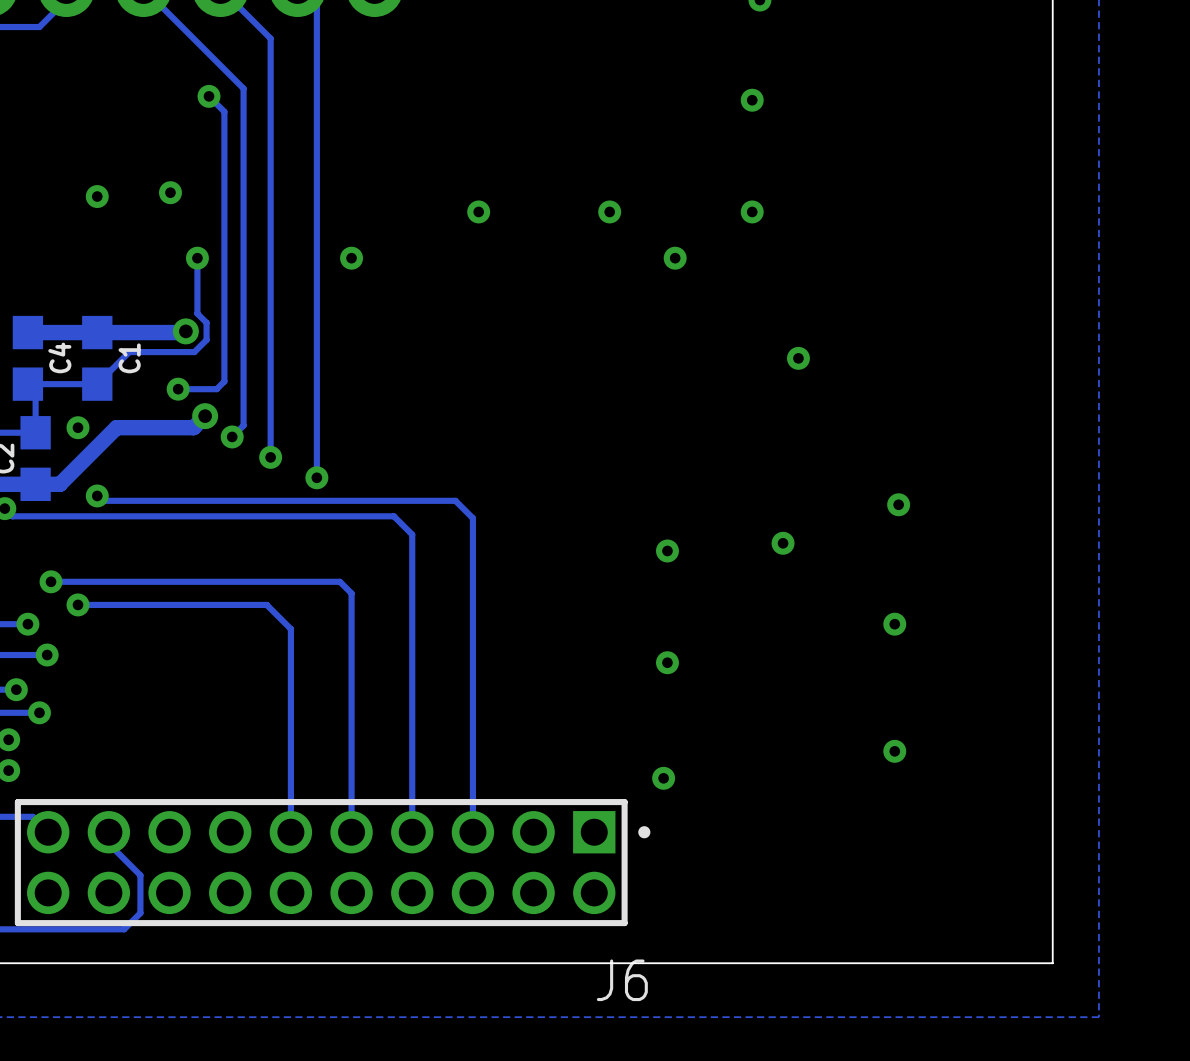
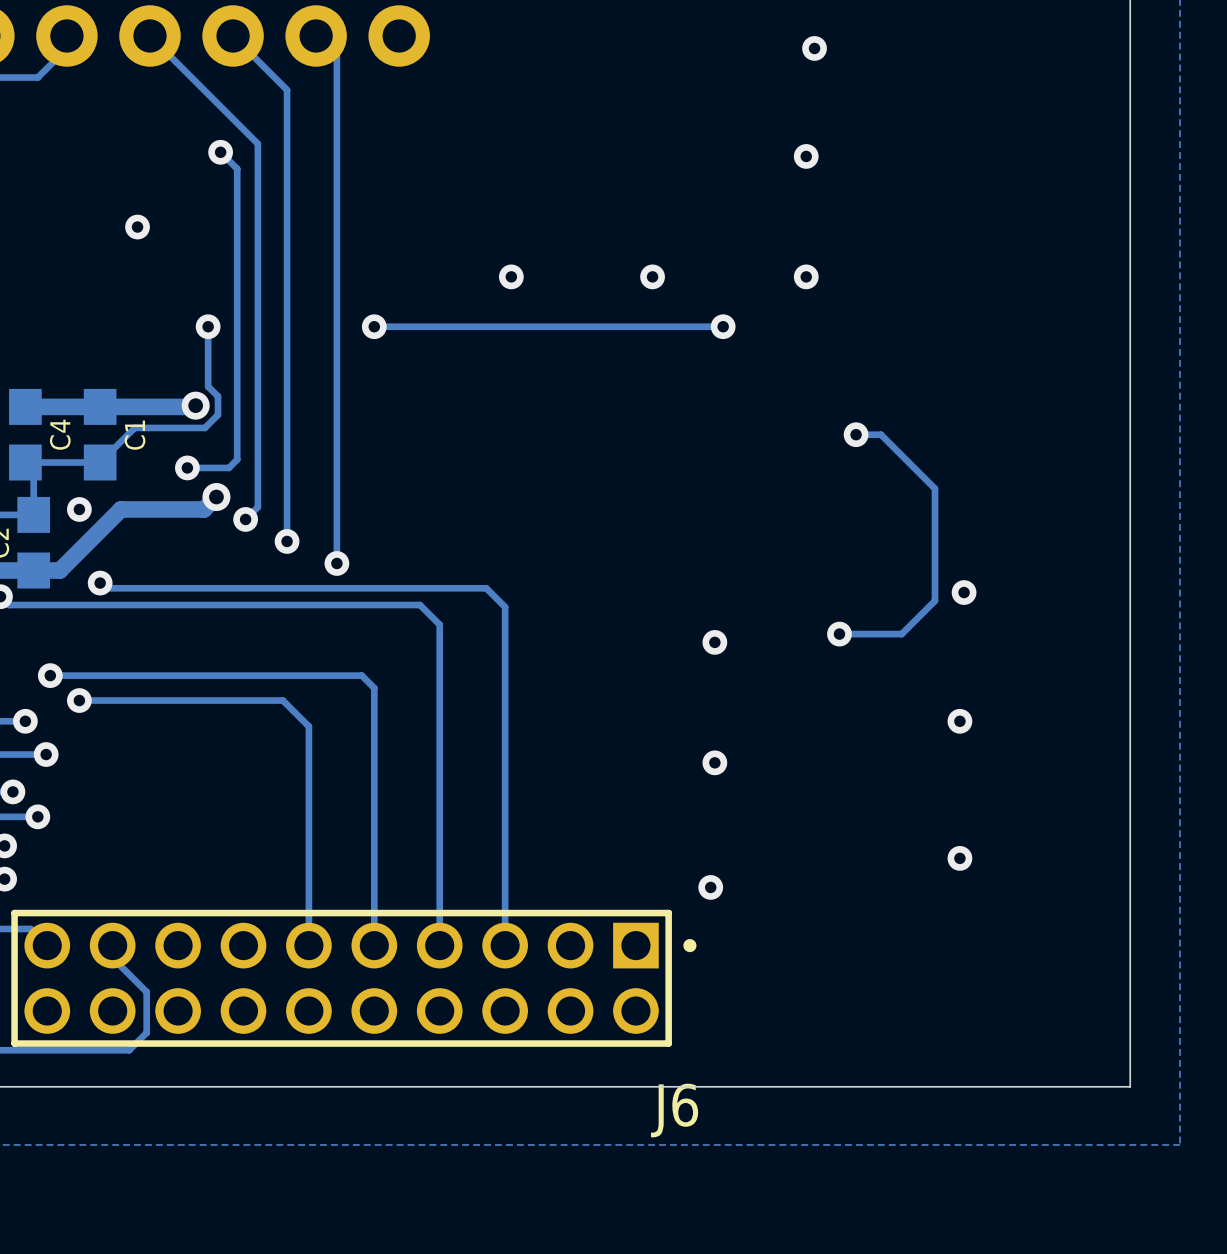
via: none -> (137, 227)
via: (170, 192) -> none
via: (97, 196) -> none
track: none -> (723, 326) (374, 326)
track: none -> (856, 434) (881, 434) (935, 488) (935, 600) (901, 634) (839, 634)

